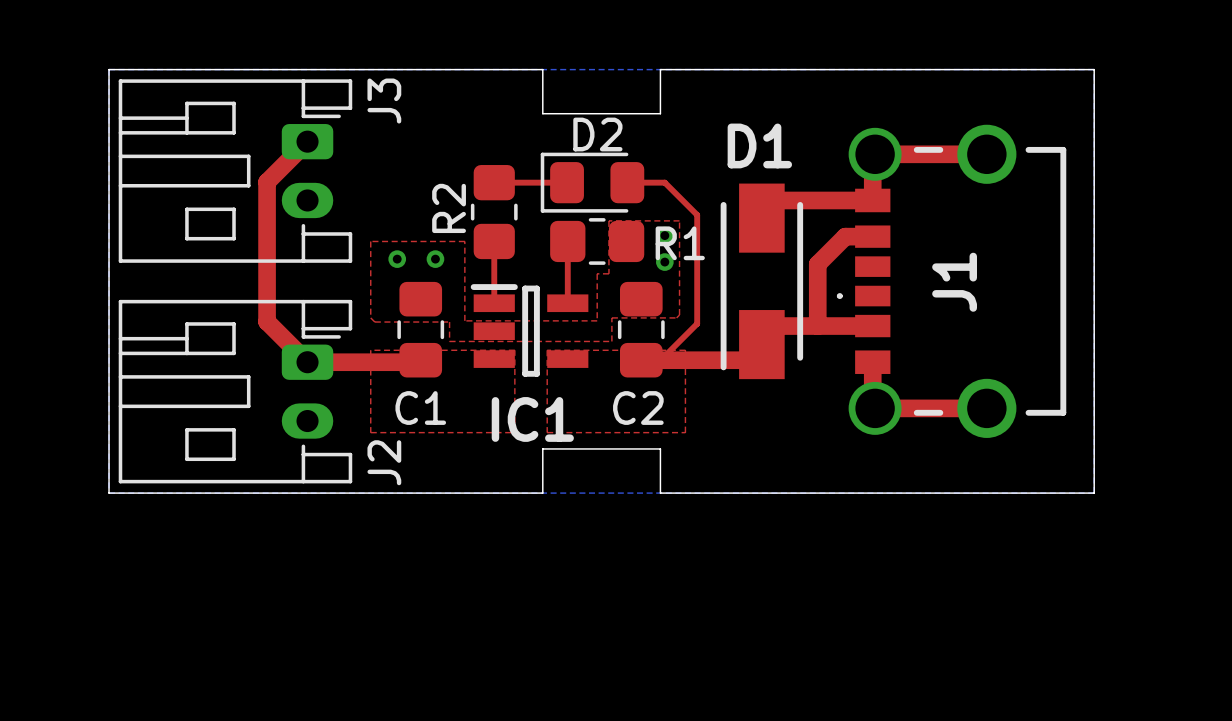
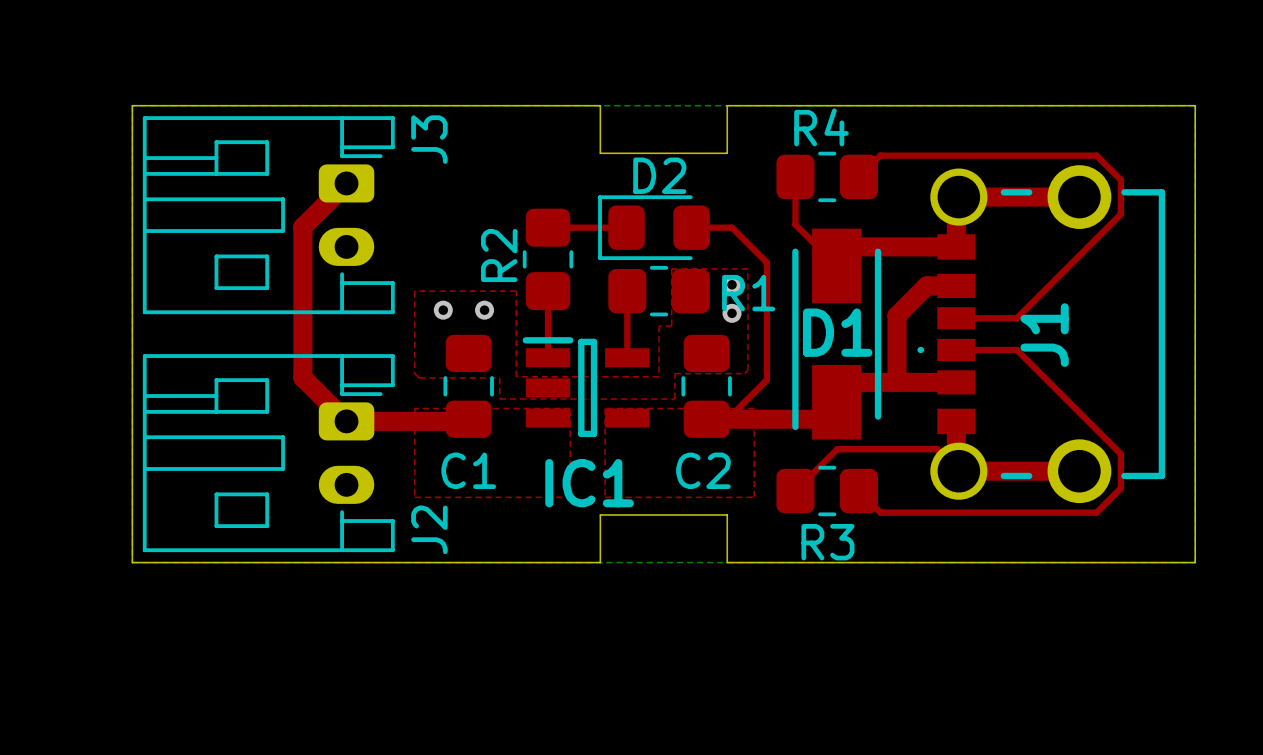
top track: none -> (795, 176) (795, 224) (836, 265)
R4: none -> (827, 176)
top track: none -> (858, 176) (880, 155) (1096, 155) (1120, 179) (1120, 214) (1016, 318) (956, 318)
D1 name position: D1 (759, 145) -> D1 (837, 332)
top track: none -> (956, 350) (1016, 350) (1120, 454) (1120, 488) (1096, 512) (880, 512) (858, 491)
top track: none -> (958, 471) (936, 449) (837, 449) (795, 491)
R3: none -> (827, 491)

